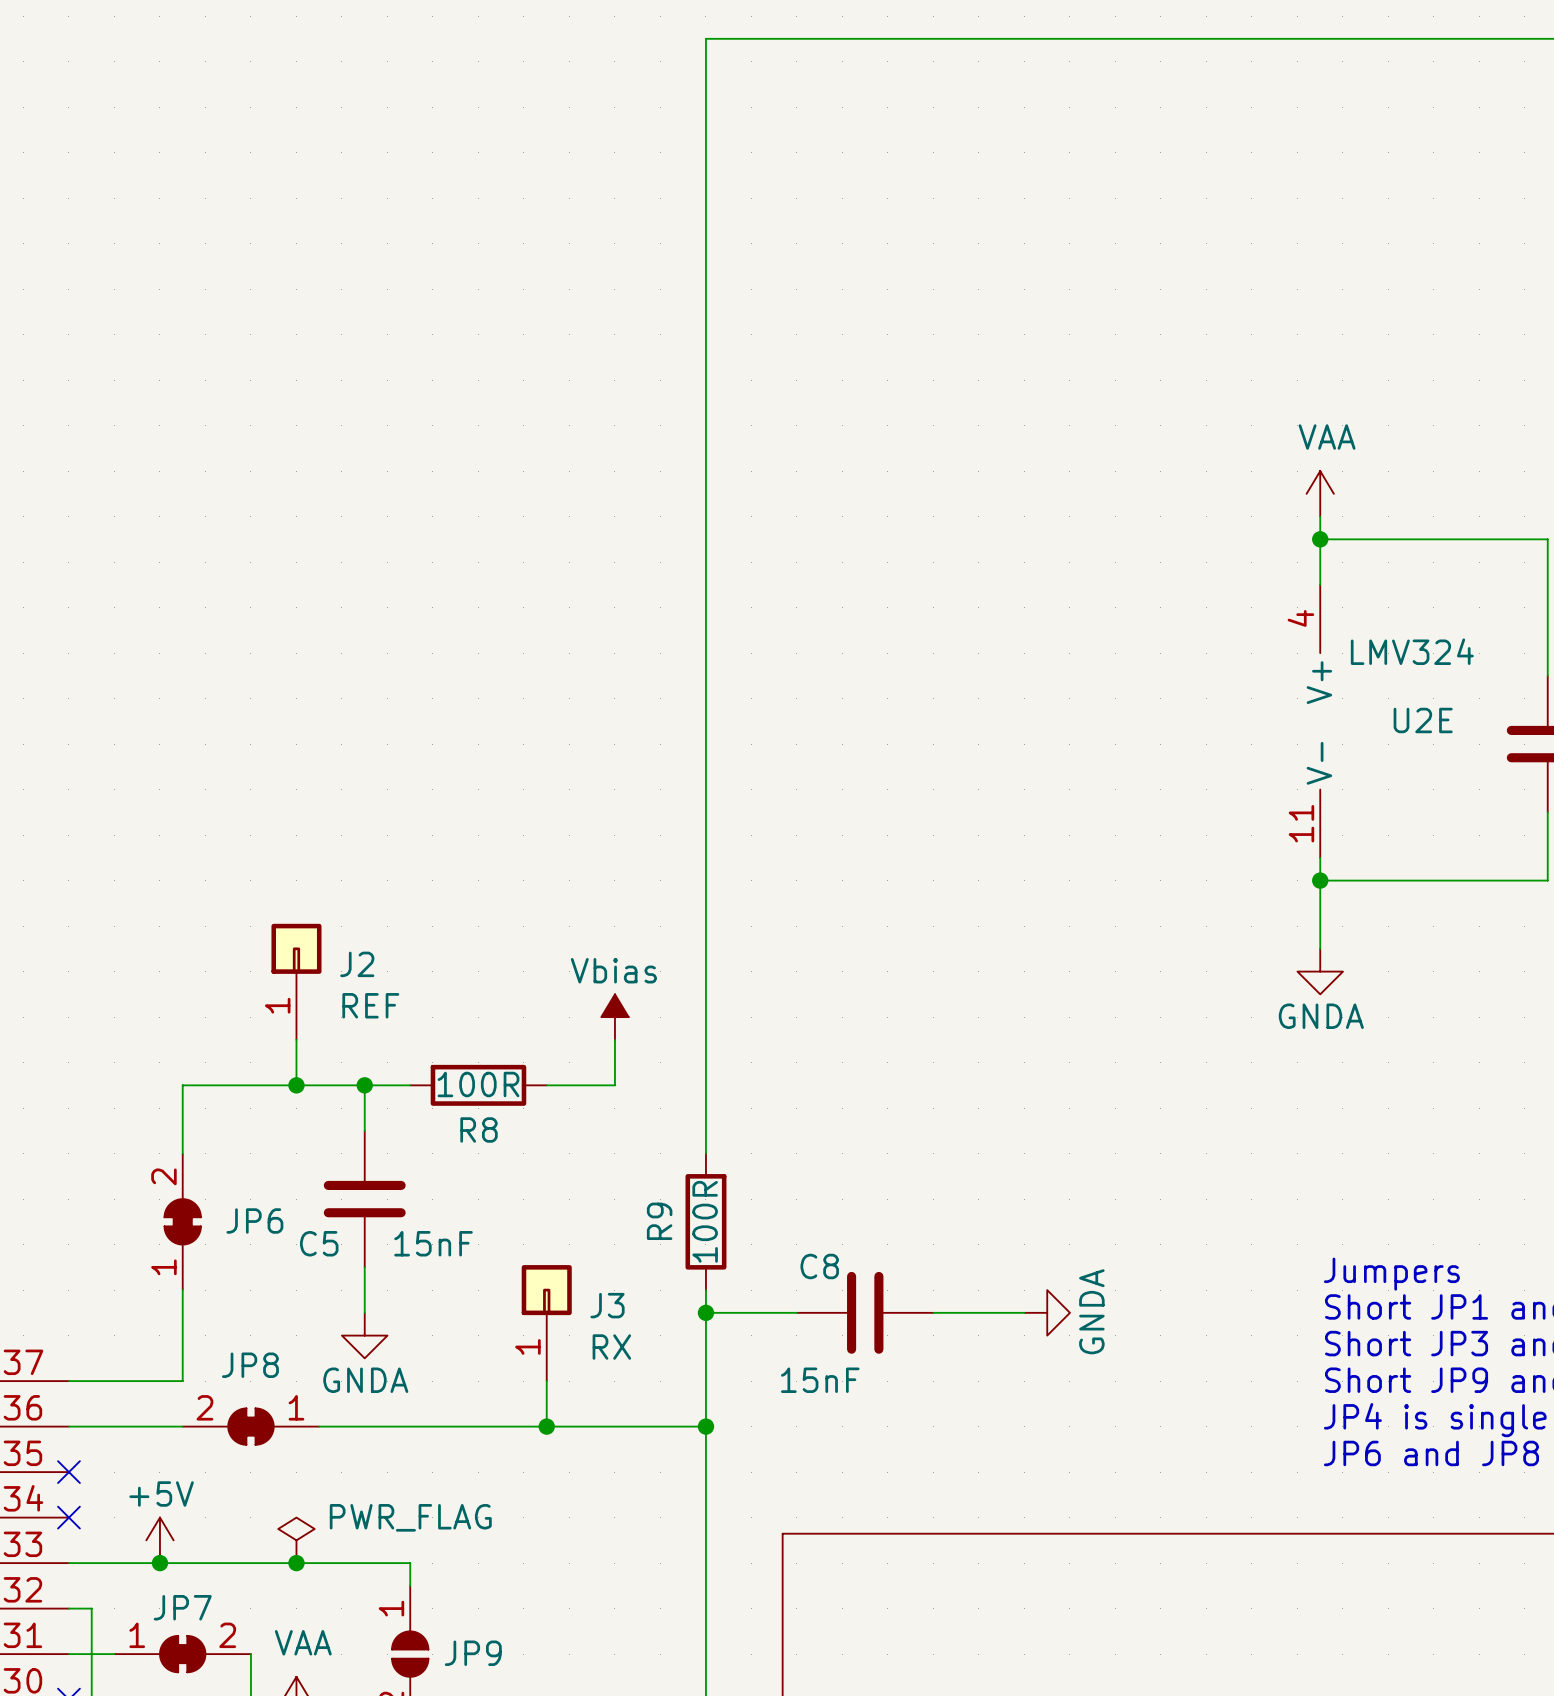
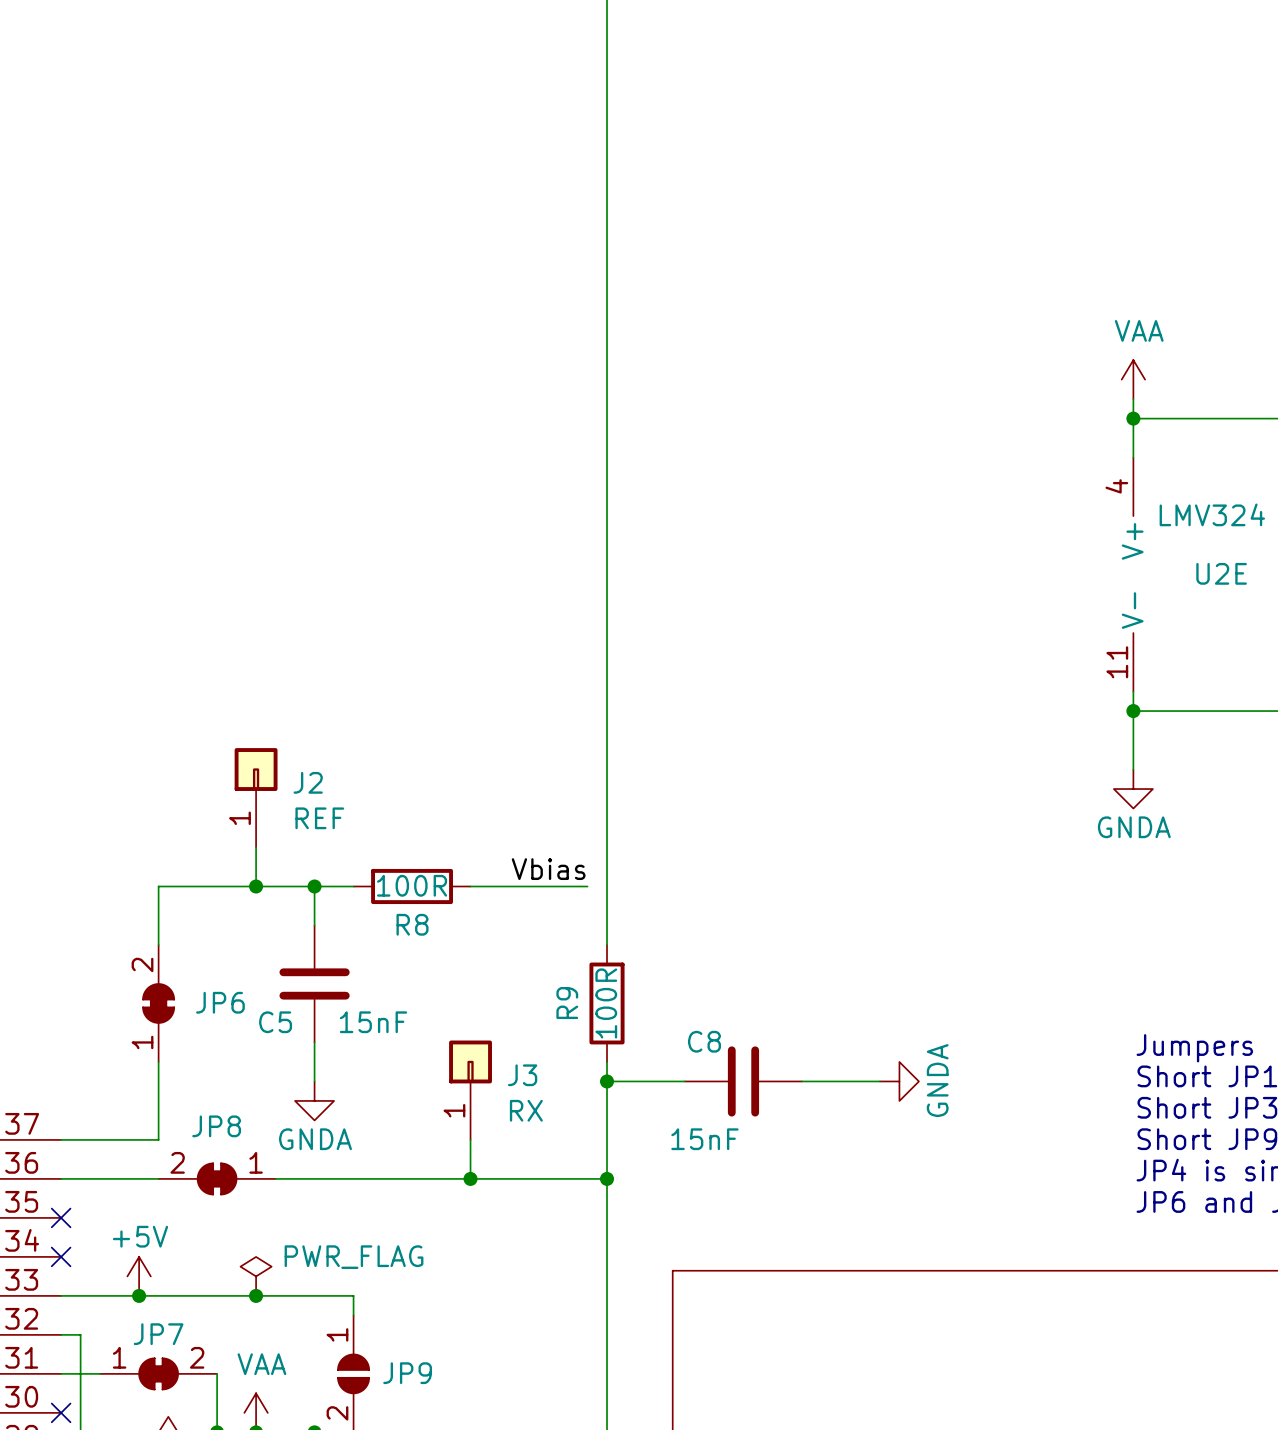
power symbol: Vbias (614, 1017) -> none
wire: (614, 1039) (614, 1085) -> (587, 886) (529, 886)
label: none -> Vbias (548, 869)

